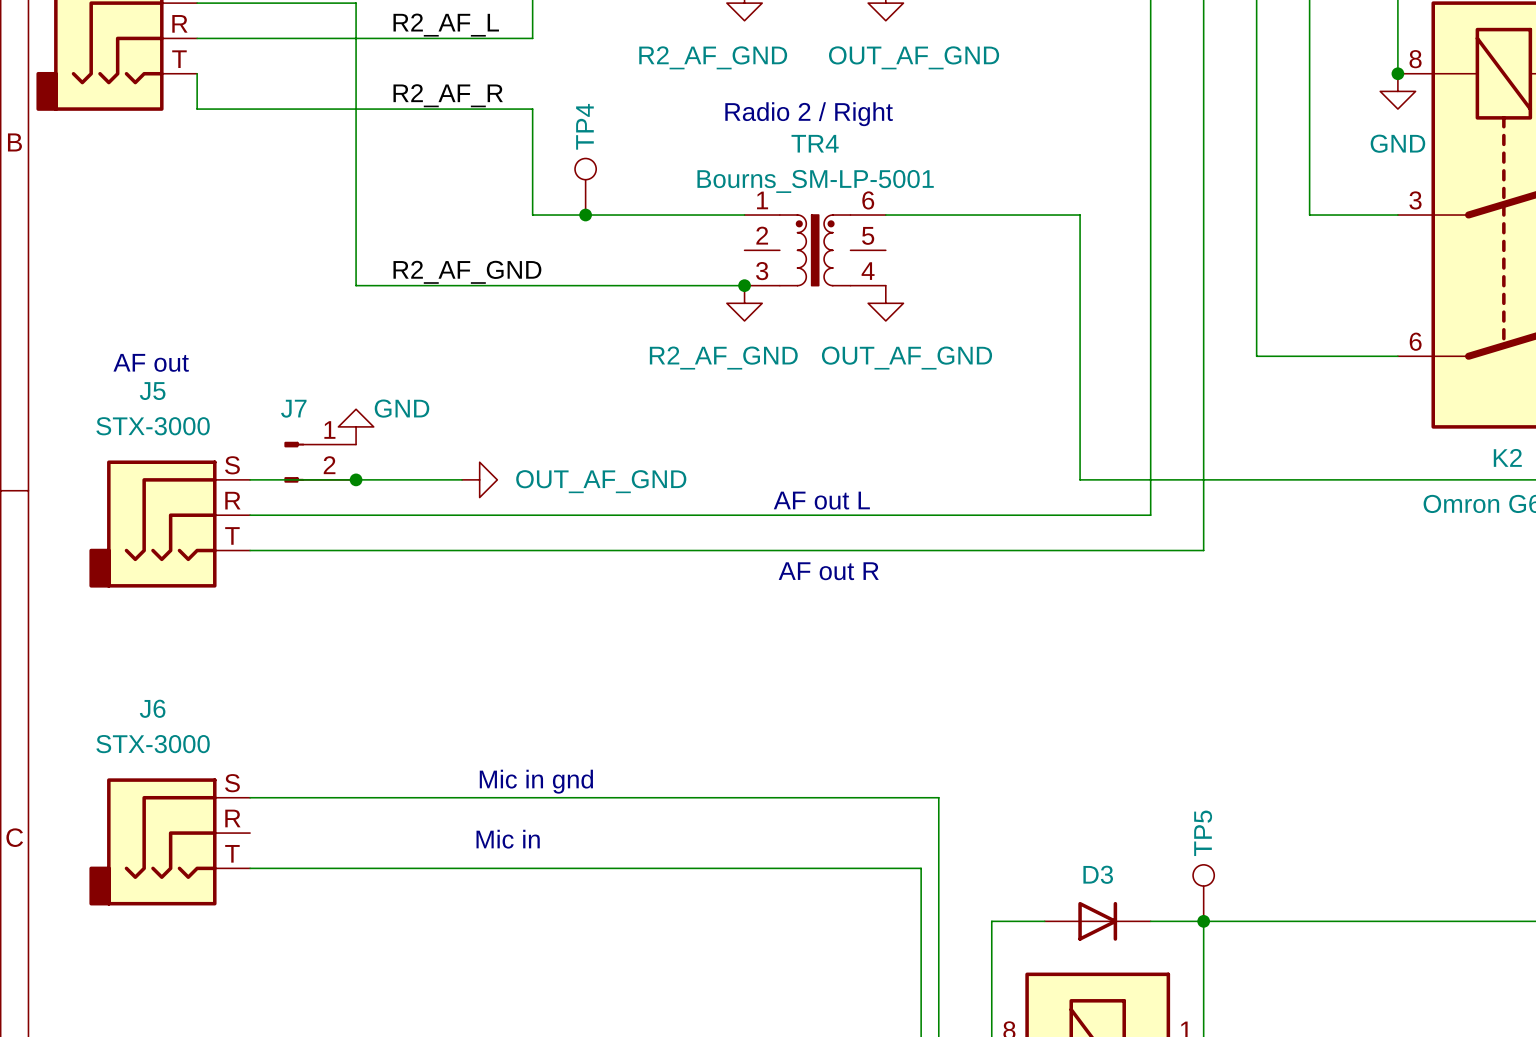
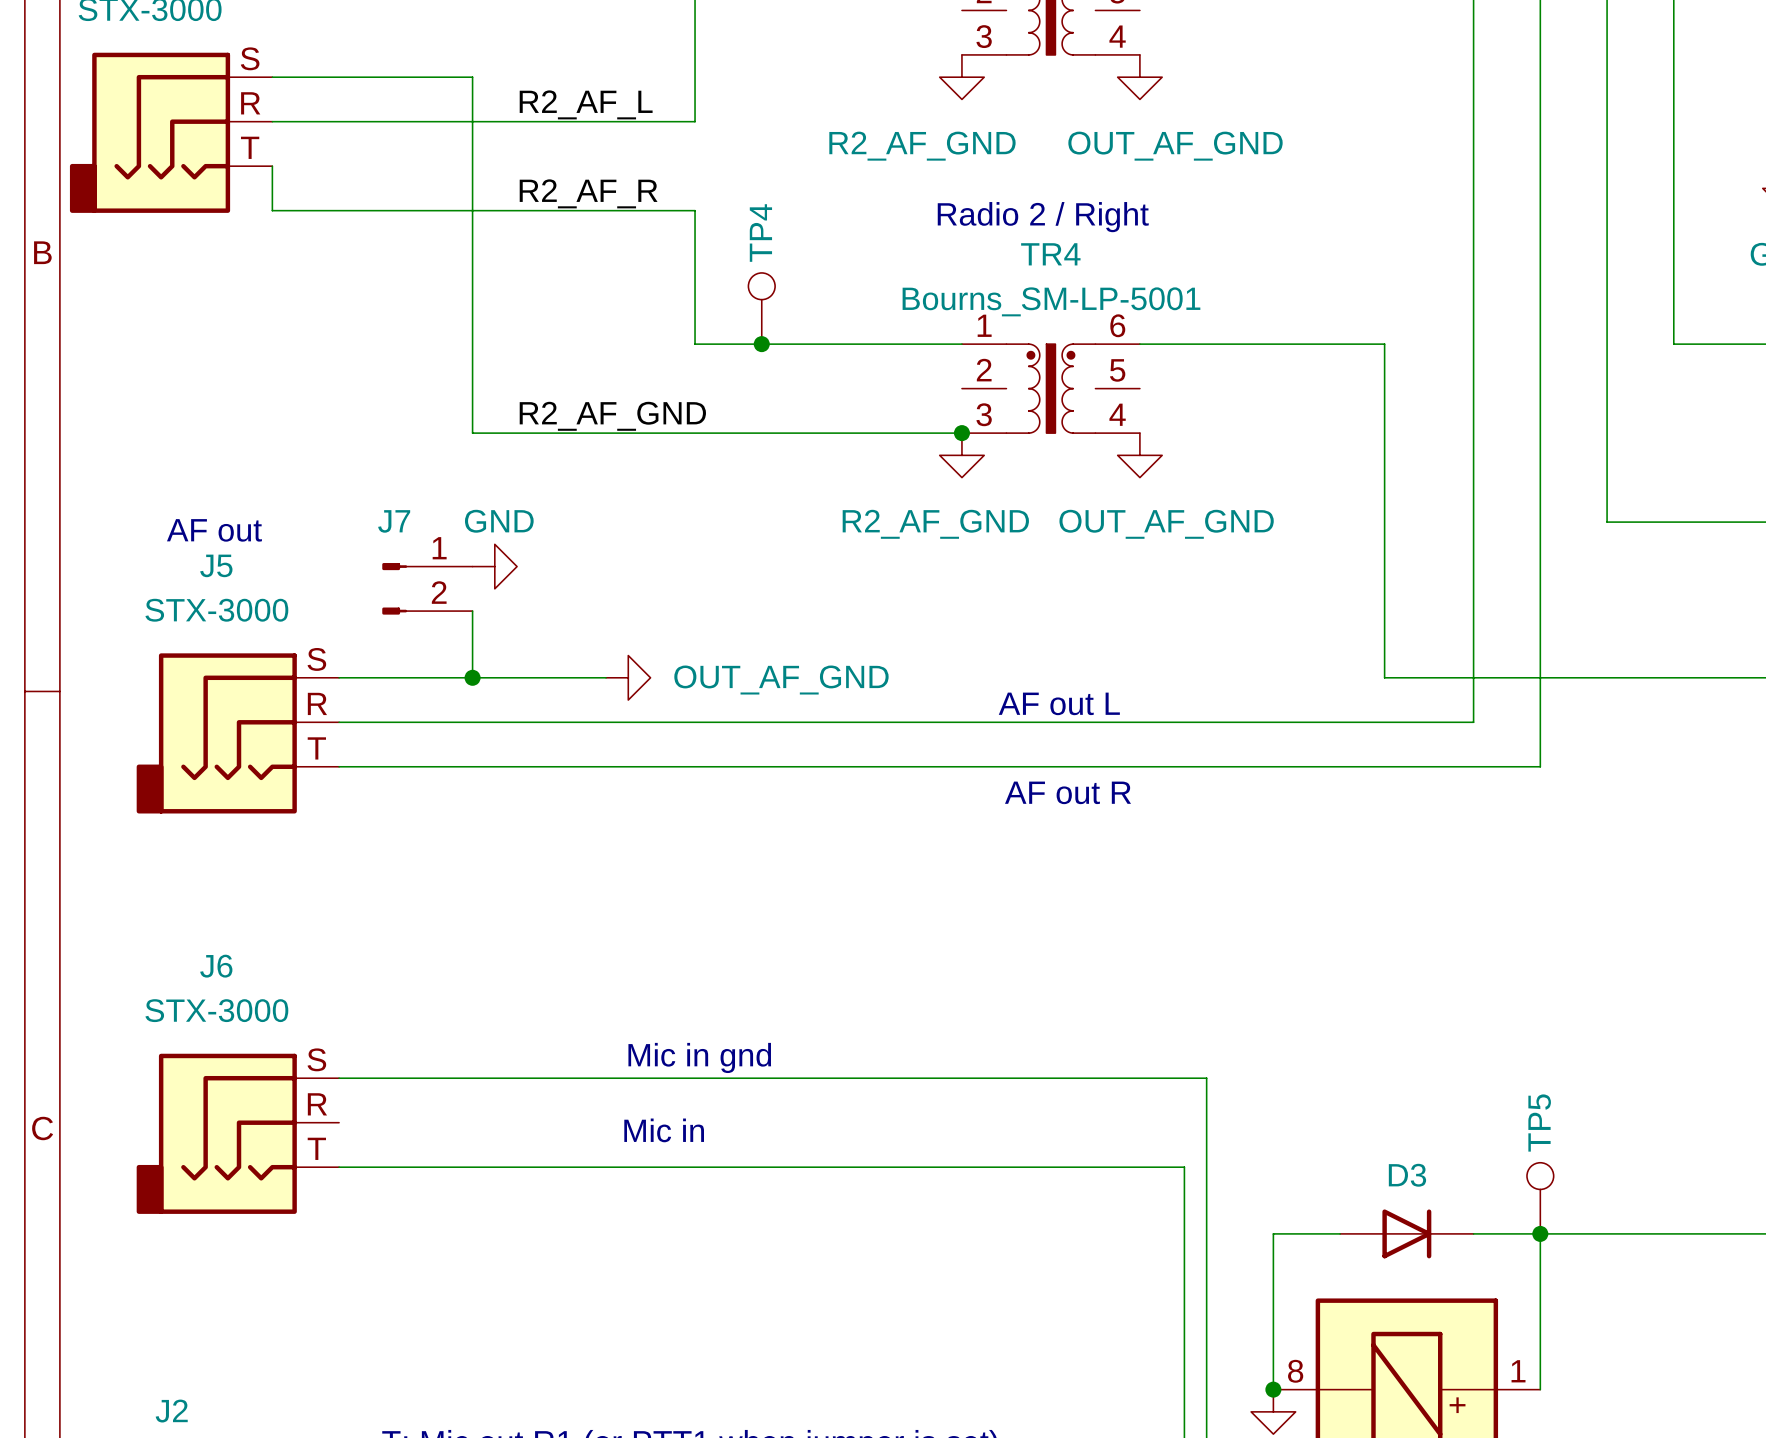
power symbol text position: GND (402, 408) -> GND (499, 521)
wire: none -> (472, 611) (472, 677)
power symbol rotation: 0° (356, 426) -> 90° clockwise (494, 566)
power symbol position: GND (356, 426) -> GND (494, 566)
J7 position: (320, 462) -> (427, 588)

